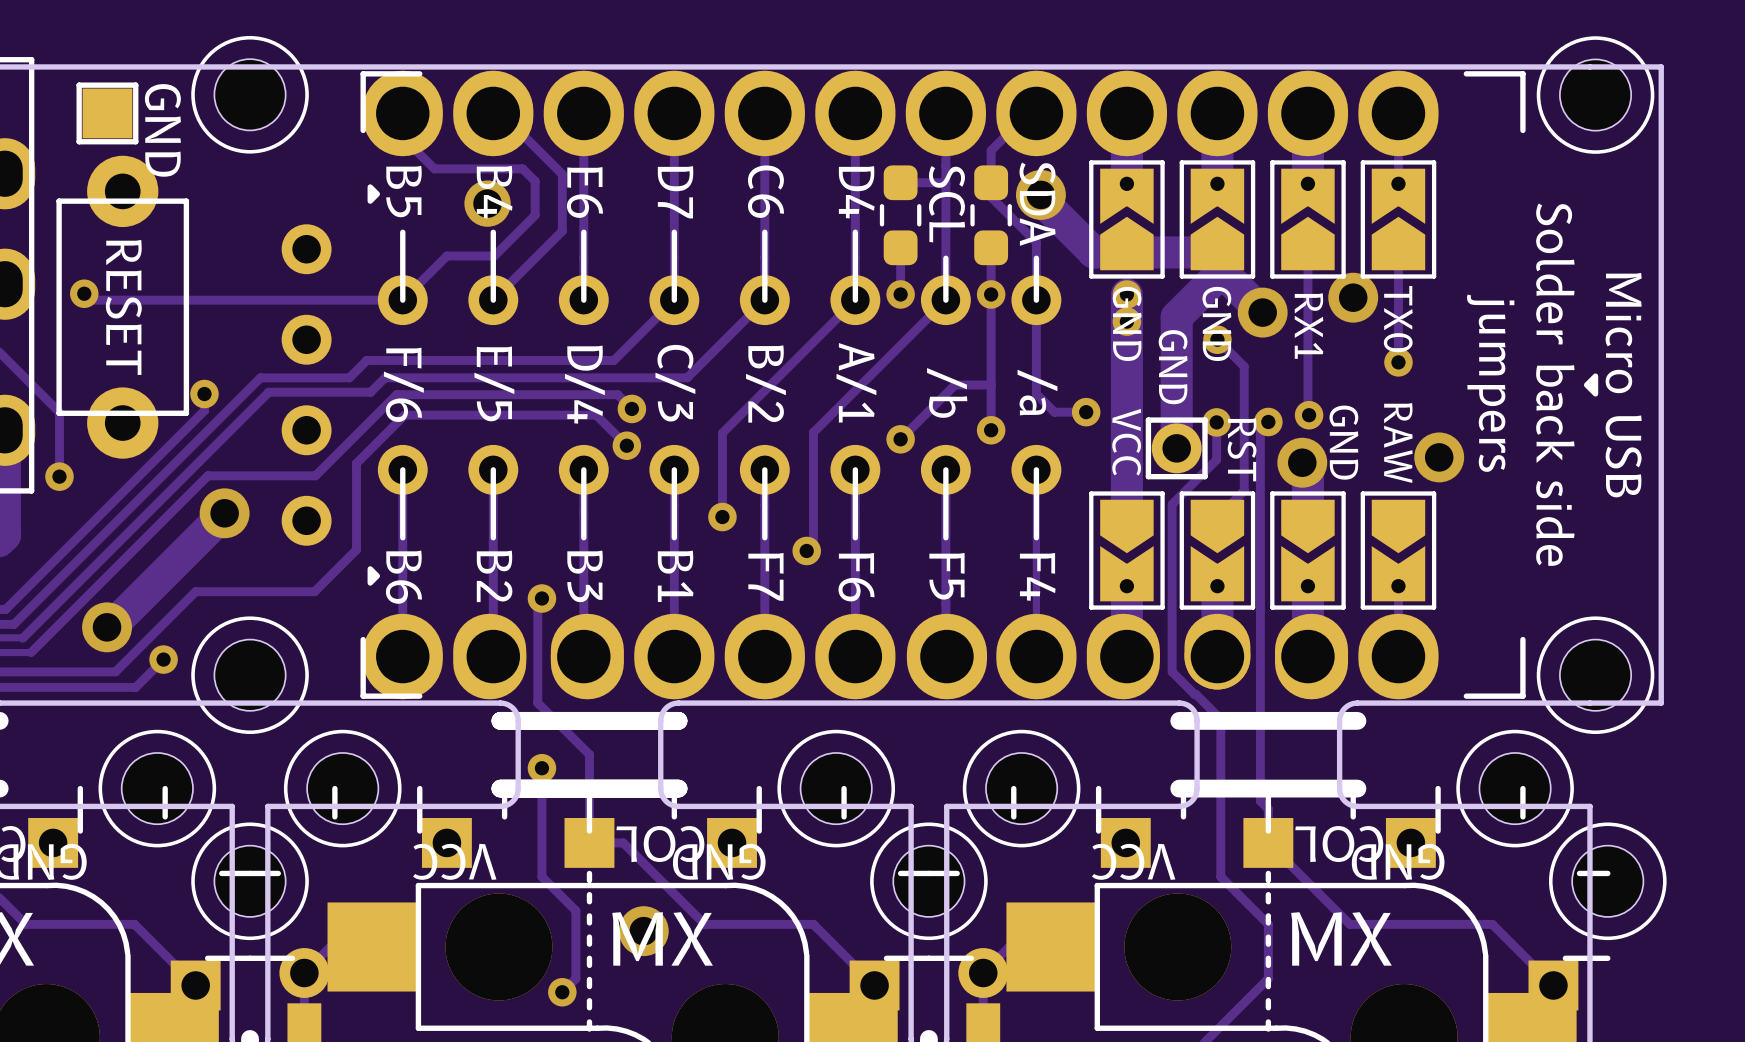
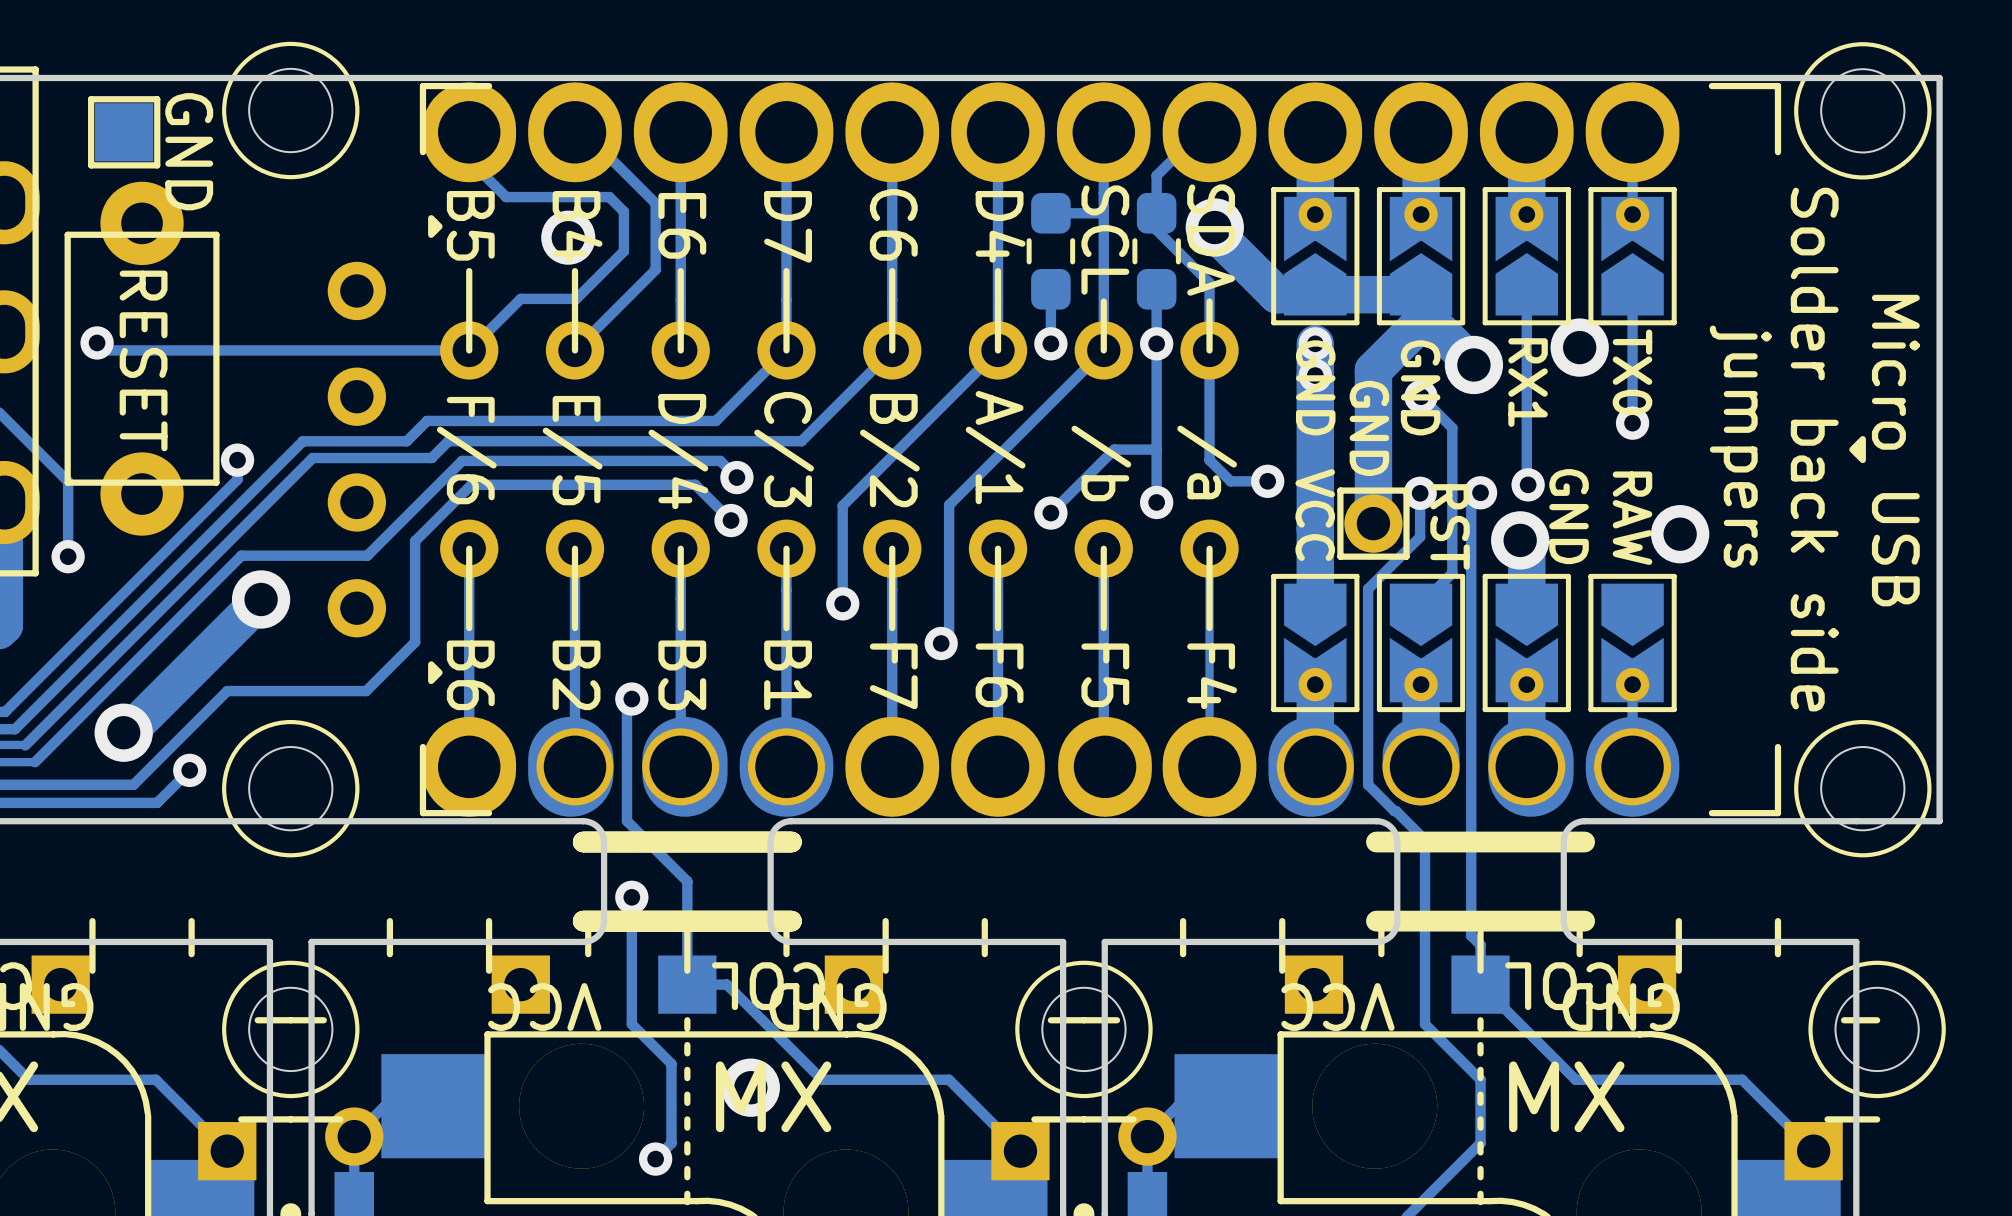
part: (157, 788) -> none
part: (342, 788) -> none
part: (836, 788) -> none
part: (1021, 788) -> none
part: (1515, 788) -> none

